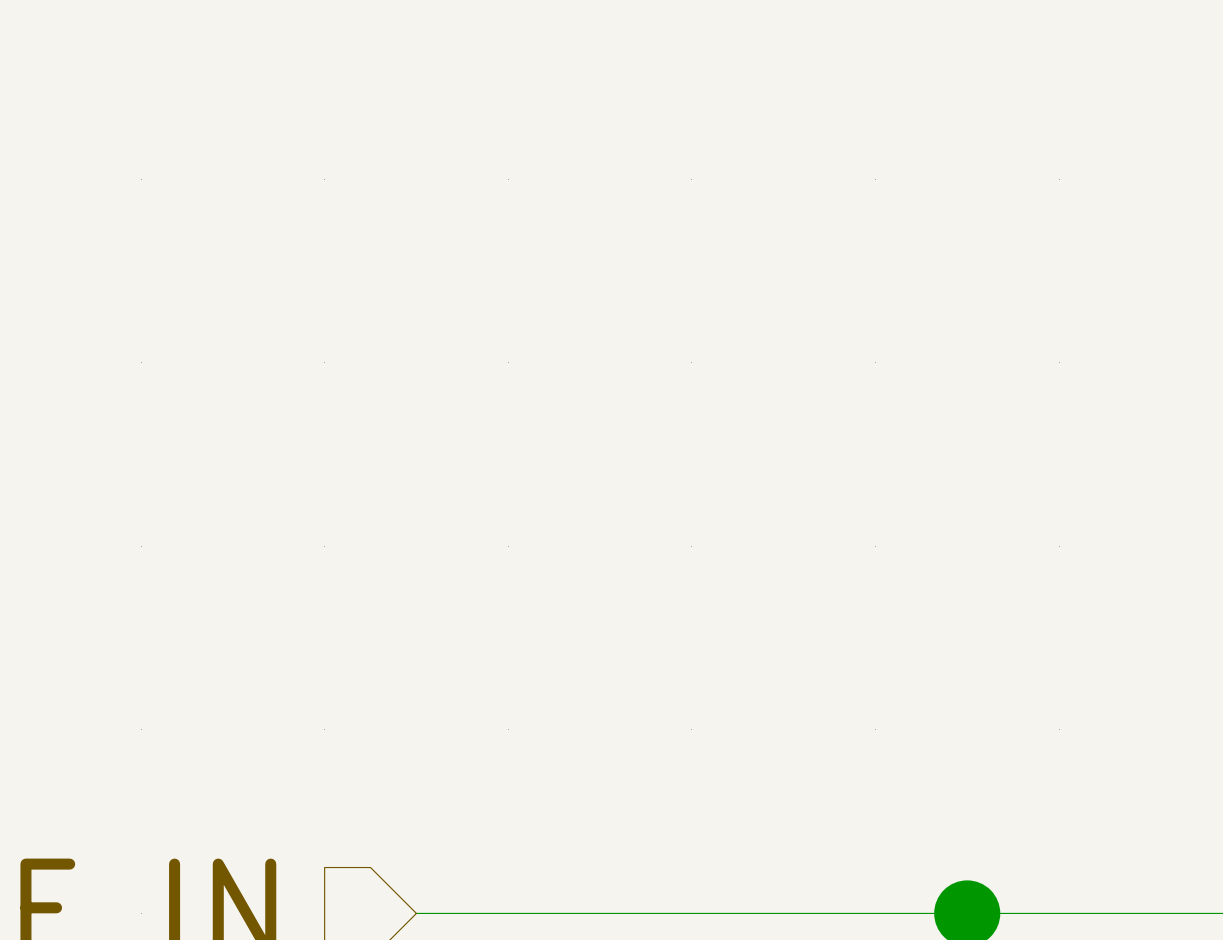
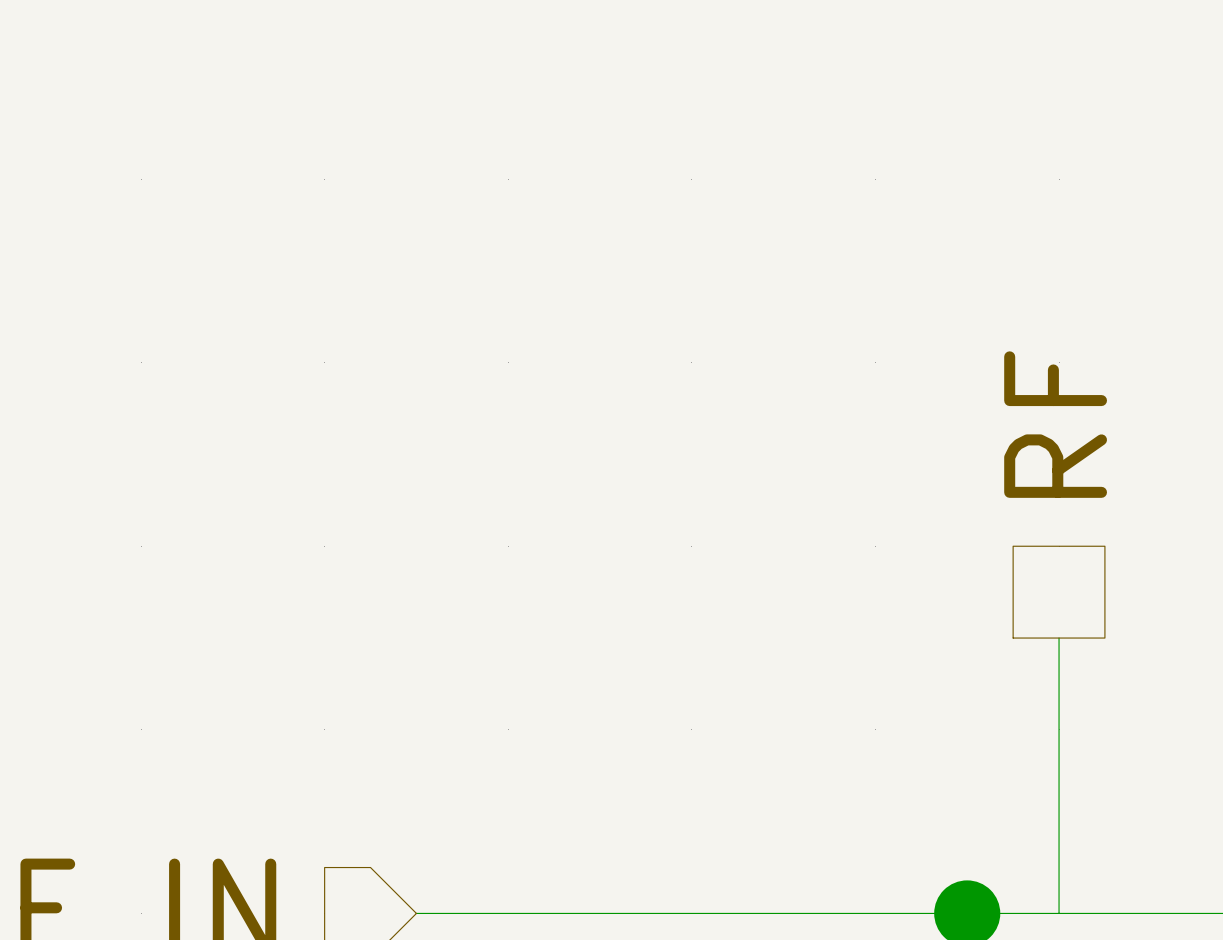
hierarchical label: none -> RF (1055, 424)
wire: none -> (1059, 638) (1059, 913)

